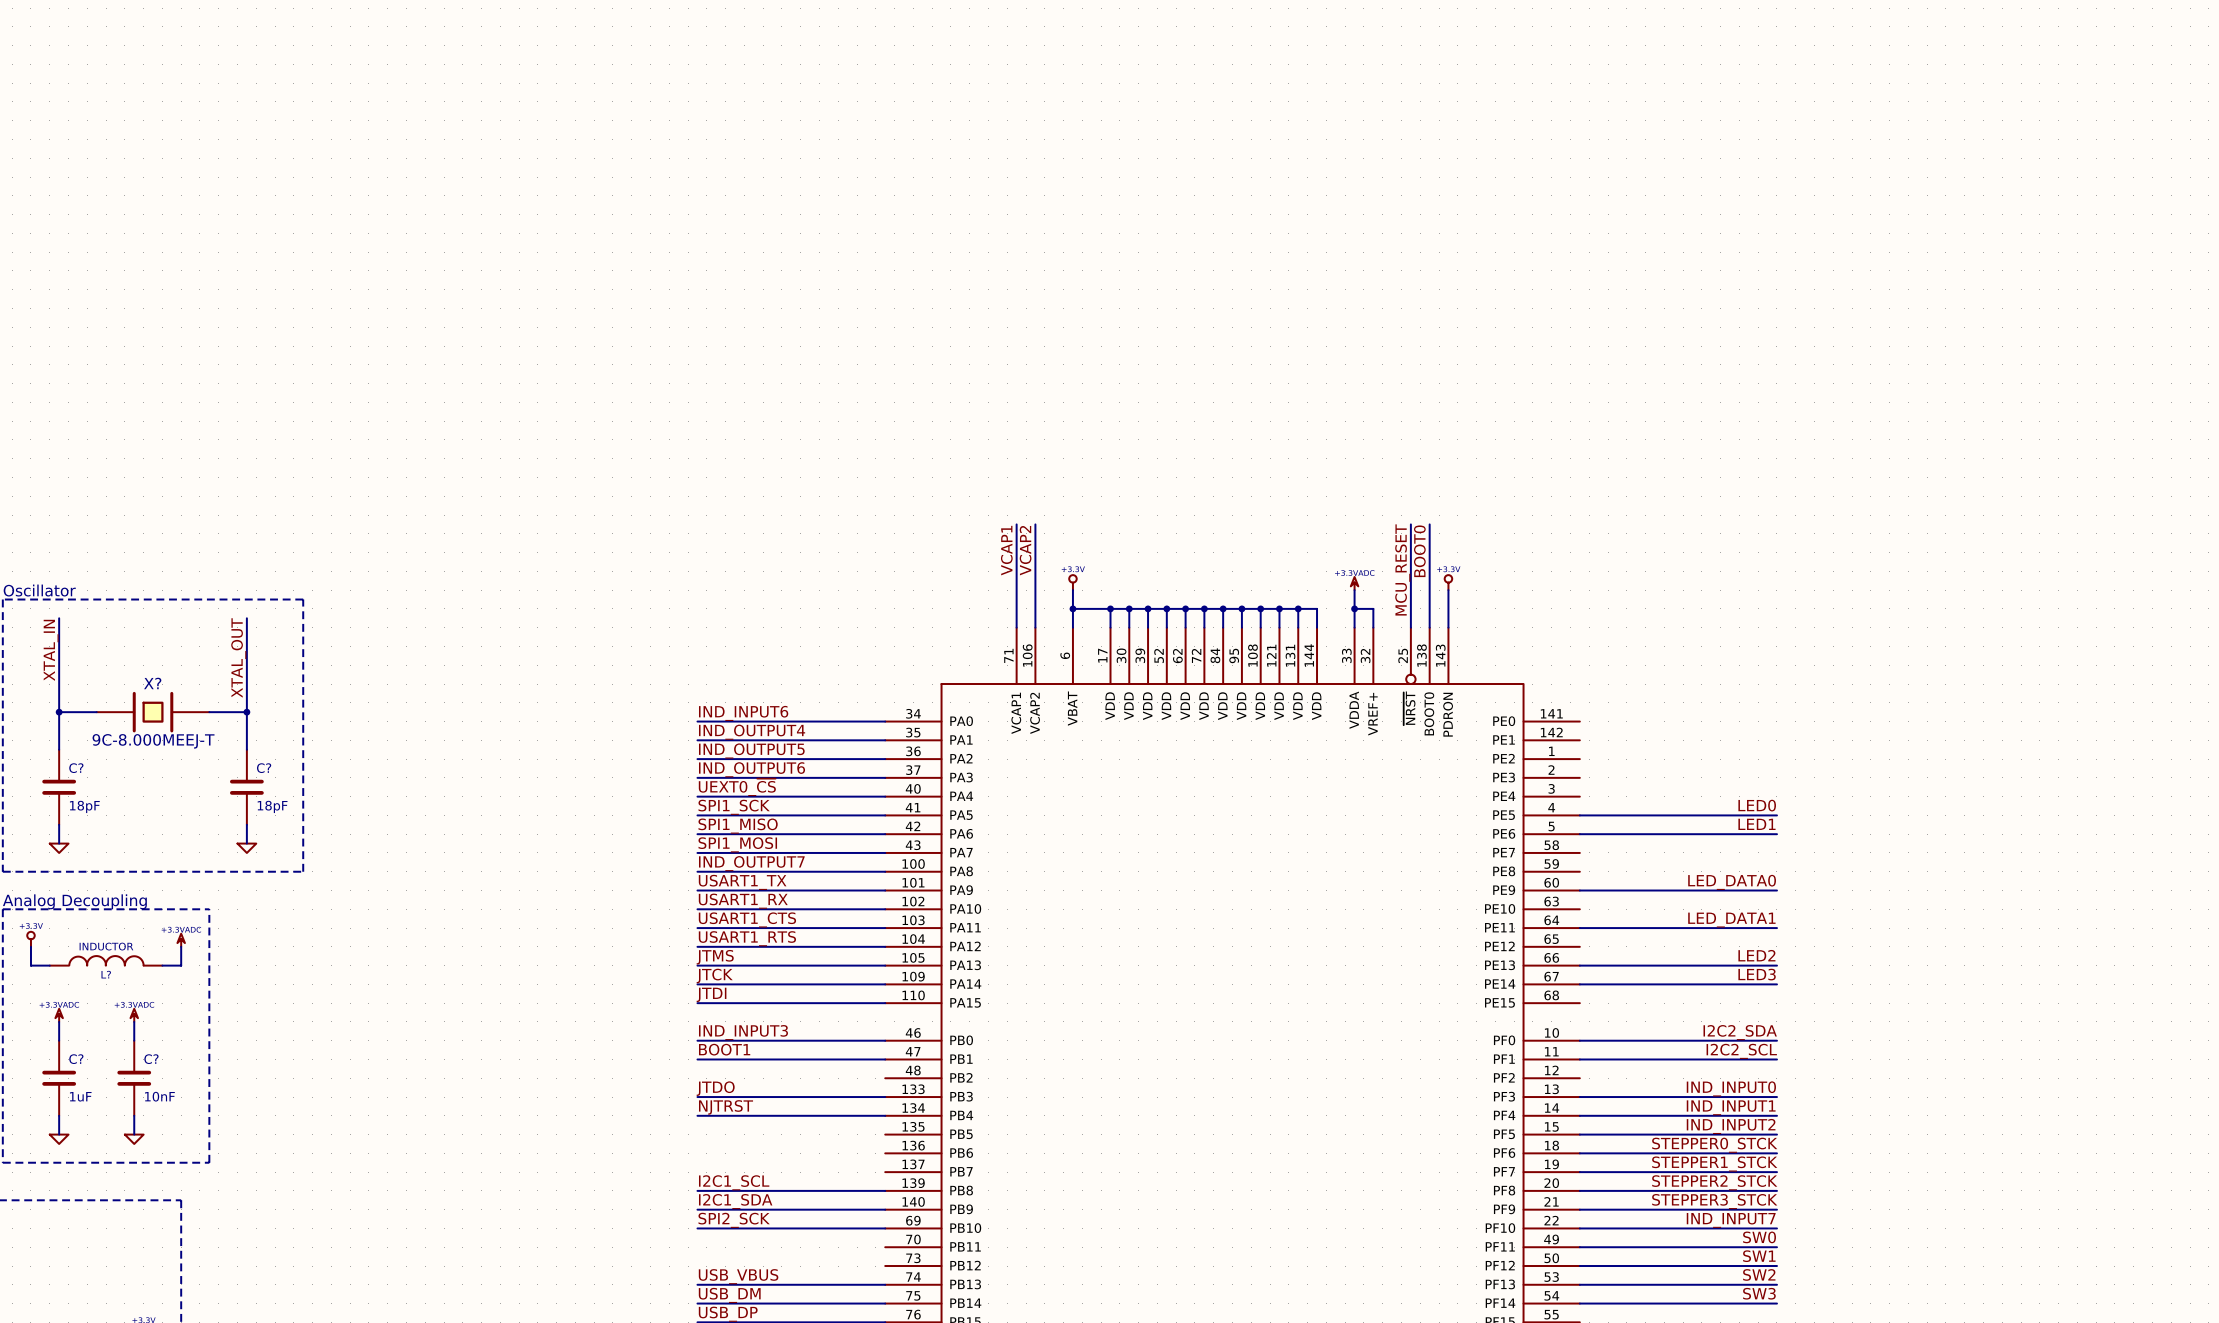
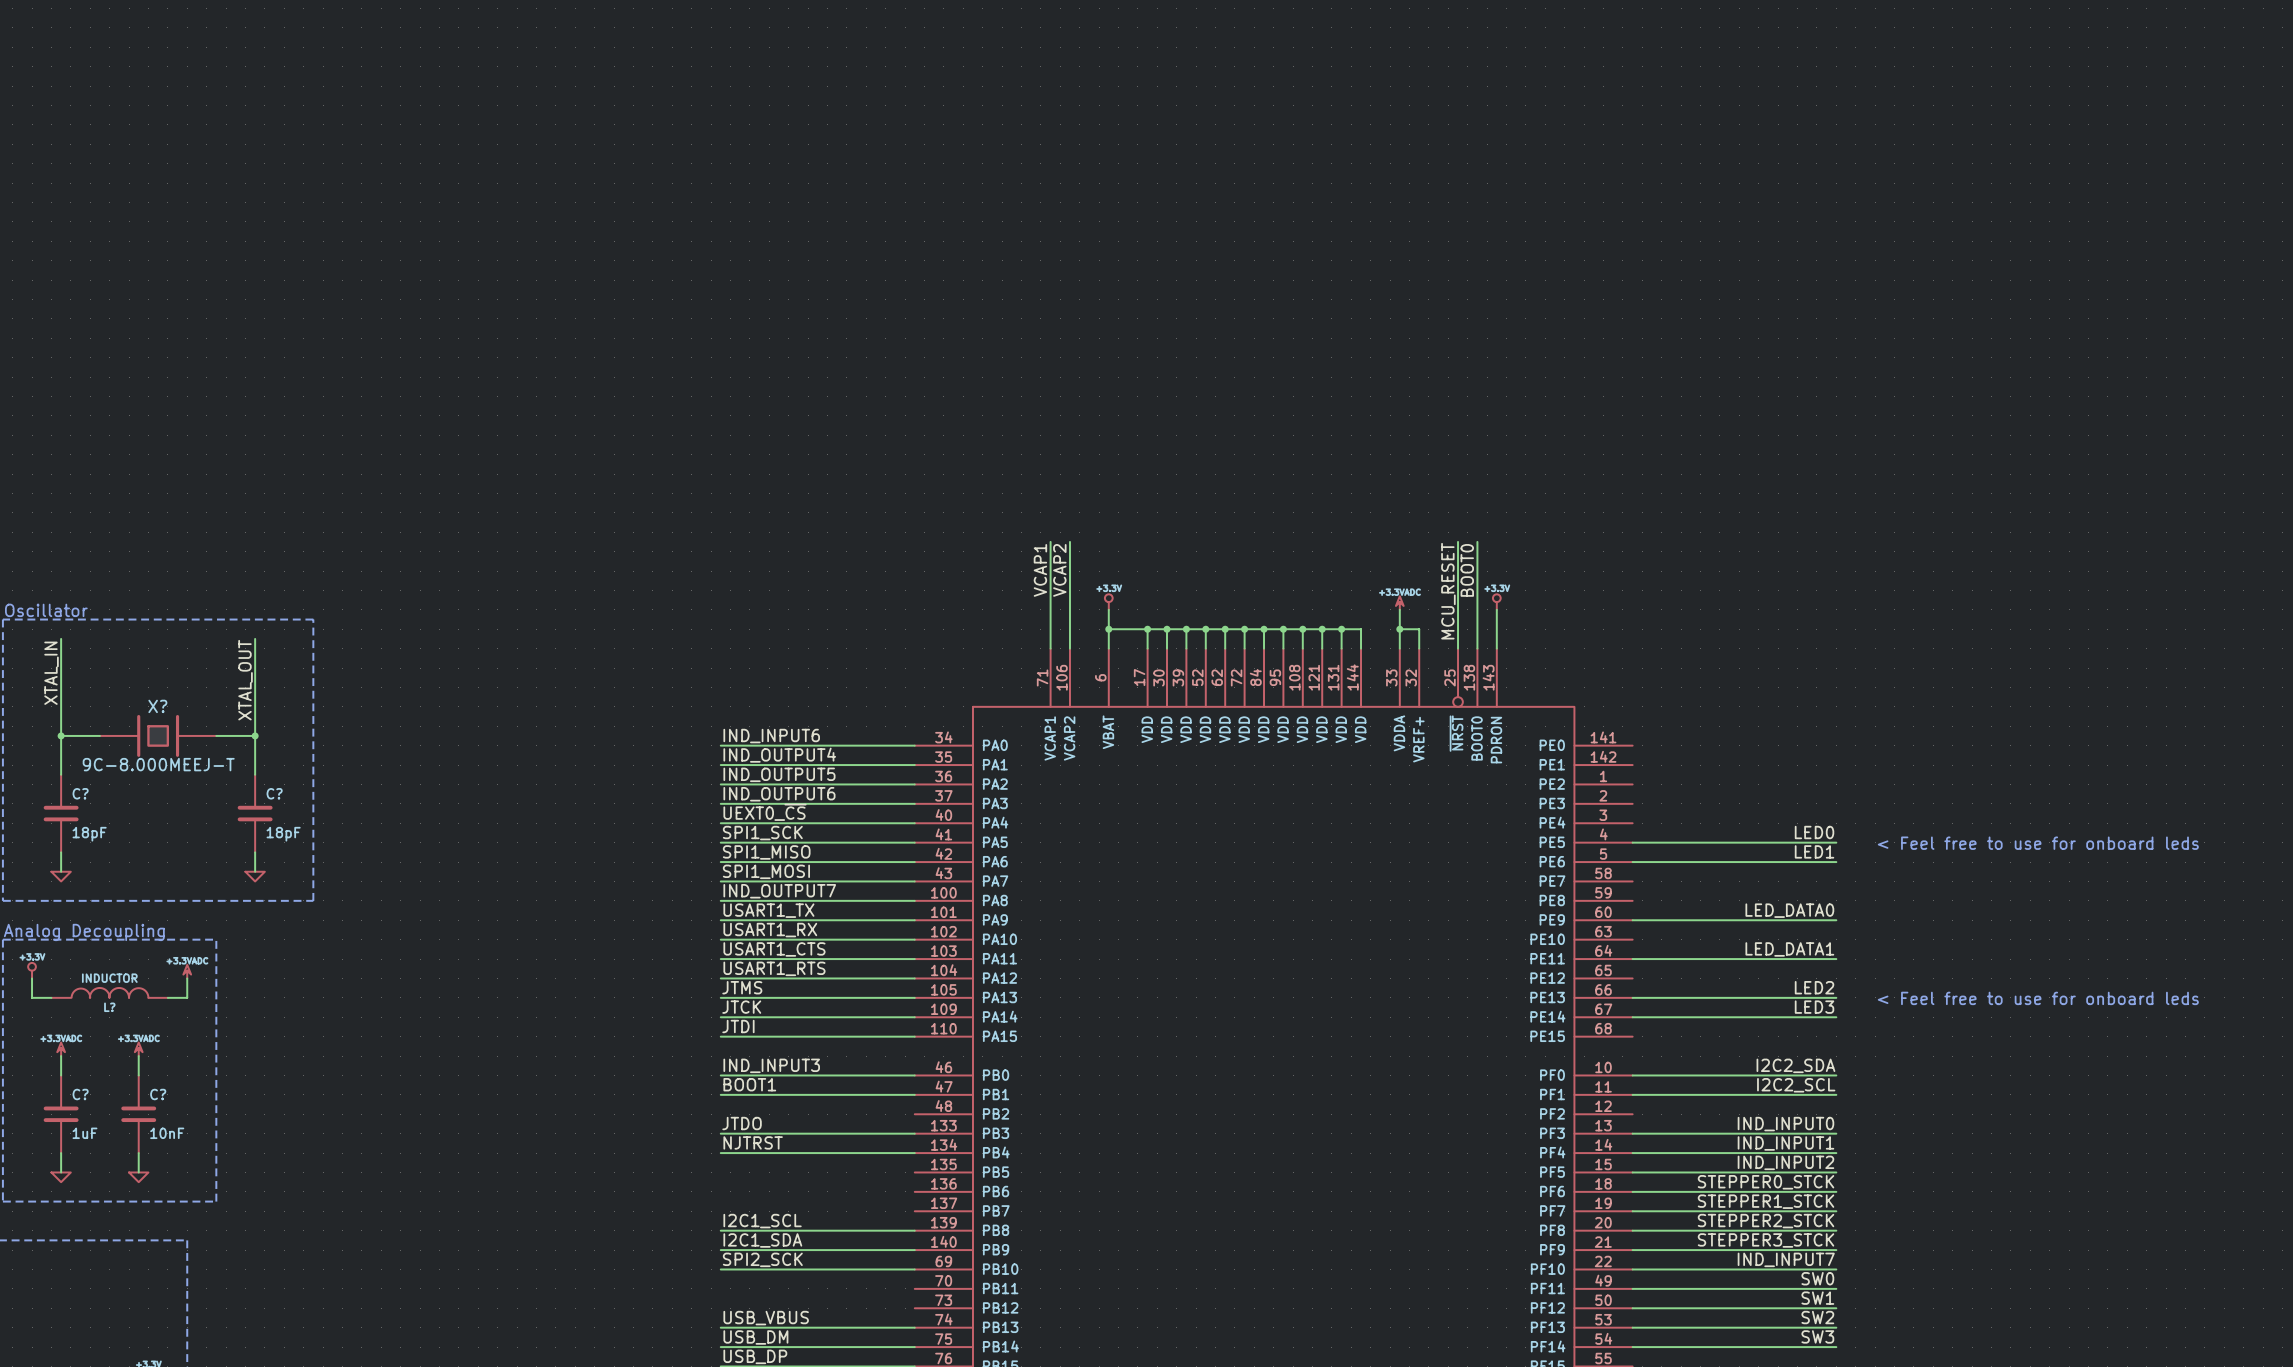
text: none -> < Feel free to use for onboard leds (2038, 843)
text: none -> < Feel free to use for onboard leds (2038, 998)

